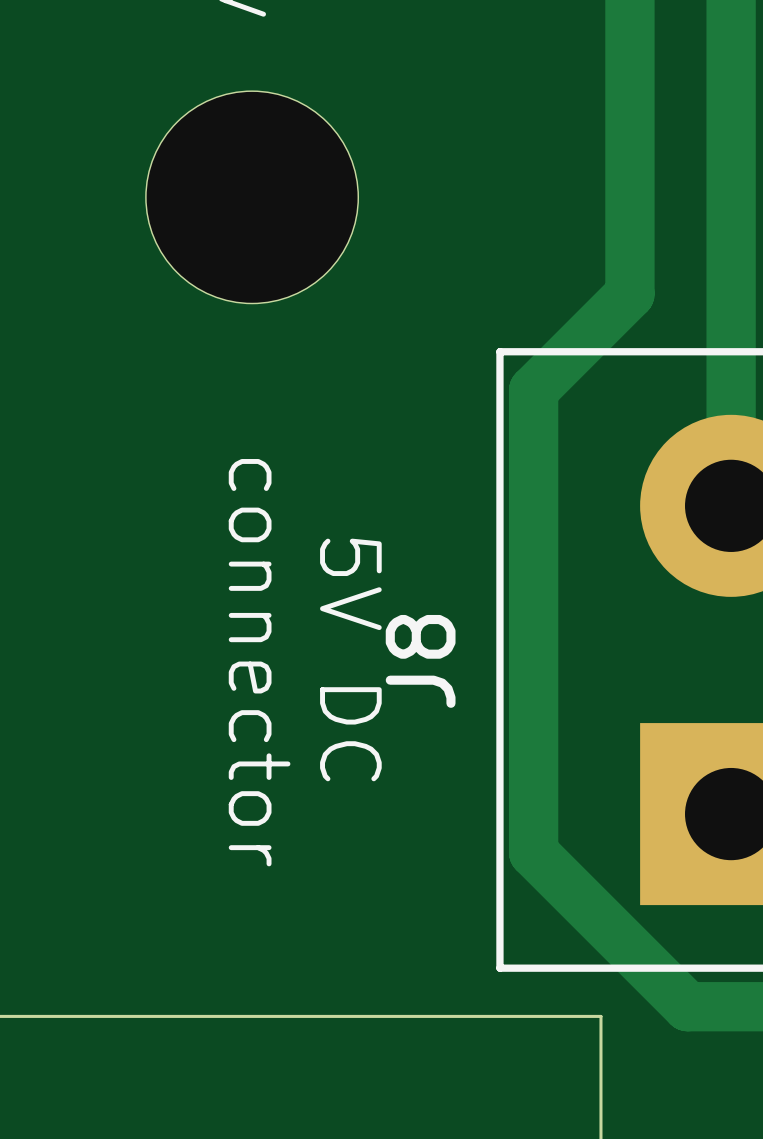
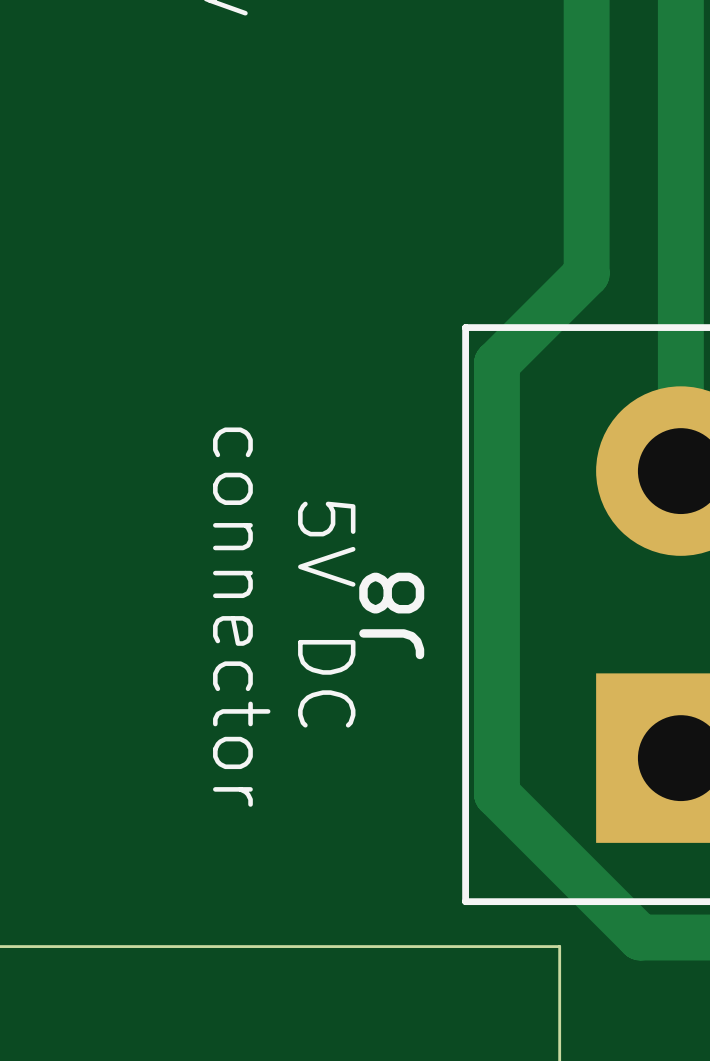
part: (252, 197) -> none

